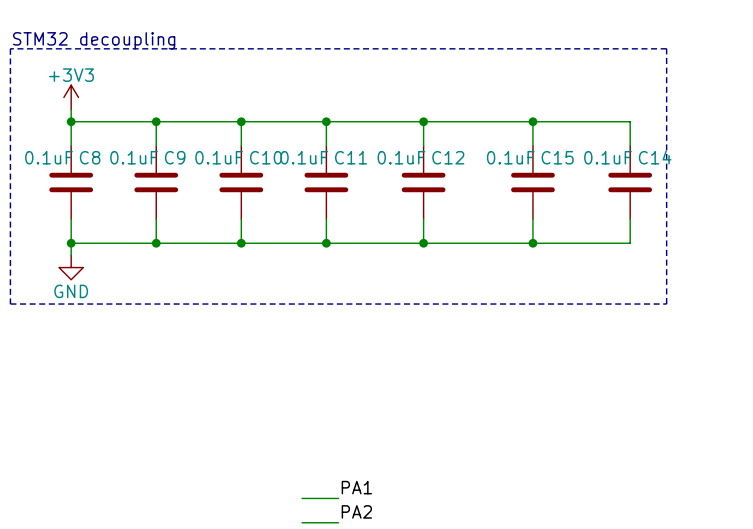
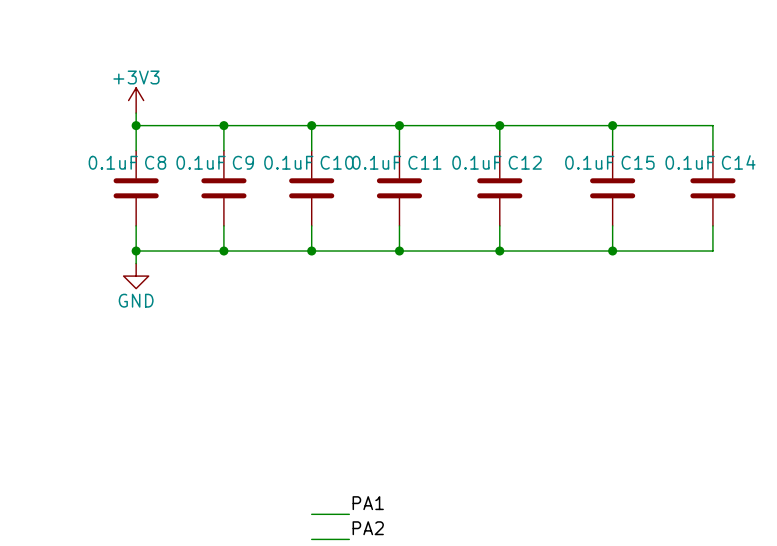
text: STM32 decoupling (94, 40) -> none
line: (10, 48) (10, 304) (666, 304) (666, 48) (10, 48) -> none
power symbol position: +3V3 (71, 97) -> +3V3 (136, 100)
wire: (71, 109) (71, 146) -> (136, 113) (136, 150)
wire: (71, 121) (131, 121) -> none
junction: (71, 121) -> none
wire: (156, 121) (156, 146) -> (223, 125) (223, 150)
junction position: (156, 121) -> (136, 125)
wire: (241, 121) (241, 146) -> (311, 125) (311, 150)
junction position: (241, 121) -> (223, 125)
wire: (326, 121) (326, 146) -> (399, 125) (399, 150)
junction position: (326, 121) -> (311, 125)
junction: none -> (399, 125)
wire: (423, 121) (423, 146) -> (499, 125) (499, 150)
junction: (423, 121) -> none
junction: none -> (499, 125)
wire: (532, 121) (532, 146) -> (612, 125) (612, 150)
junction: (532, 121) -> none
junction: none -> (612, 125)
wire: (630, 121) (630, 146) -> (650, 125) (712, 125) (712, 150)
C8 position: (71, 182) -> (136, 188)
C9 position: (156, 182) -> (223, 188)
C10 position: (241, 182) -> (311, 188)
C11 position: (326, 182) -> (399, 188)
C12 position: (423, 182) -> (499, 188)
C15 position: (532, 182) -> (612, 188)
C14 position: (630, 182) -> (712, 188)
wire: (71, 218) (71, 255) -> (136, 225) (136, 263)
wire: (156, 218) (156, 243) -> (223, 225) (223, 251)
wire: (241, 218) (241, 243) -> (311, 225) (311, 251)
wire: (326, 218) (326, 243) -> (399, 225) (399, 251)
wire: (423, 218) (423, 243) -> (499, 225) (499, 251)
wire: (532, 218) (532, 243) -> (612, 225) (612, 251)
wire: (630, 218) (630, 243) -> (712, 225) (712, 251) (650, 251)
wire: (71, 243) (131, 243) -> none
junction: (71, 243) -> none
junction position: (156, 243) -> (136, 251)
junction position: (241, 243) -> (223, 251)
junction position: (326, 243) -> (311, 251)
junction: none -> (399, 251)
junction: (423, 243) -> none
junction: none -> (499, 251)
junction: (532, 243) -> none
junction: none -> (612, 251)
power symbol position: GND (71, 267) -> GND (136, 276)

